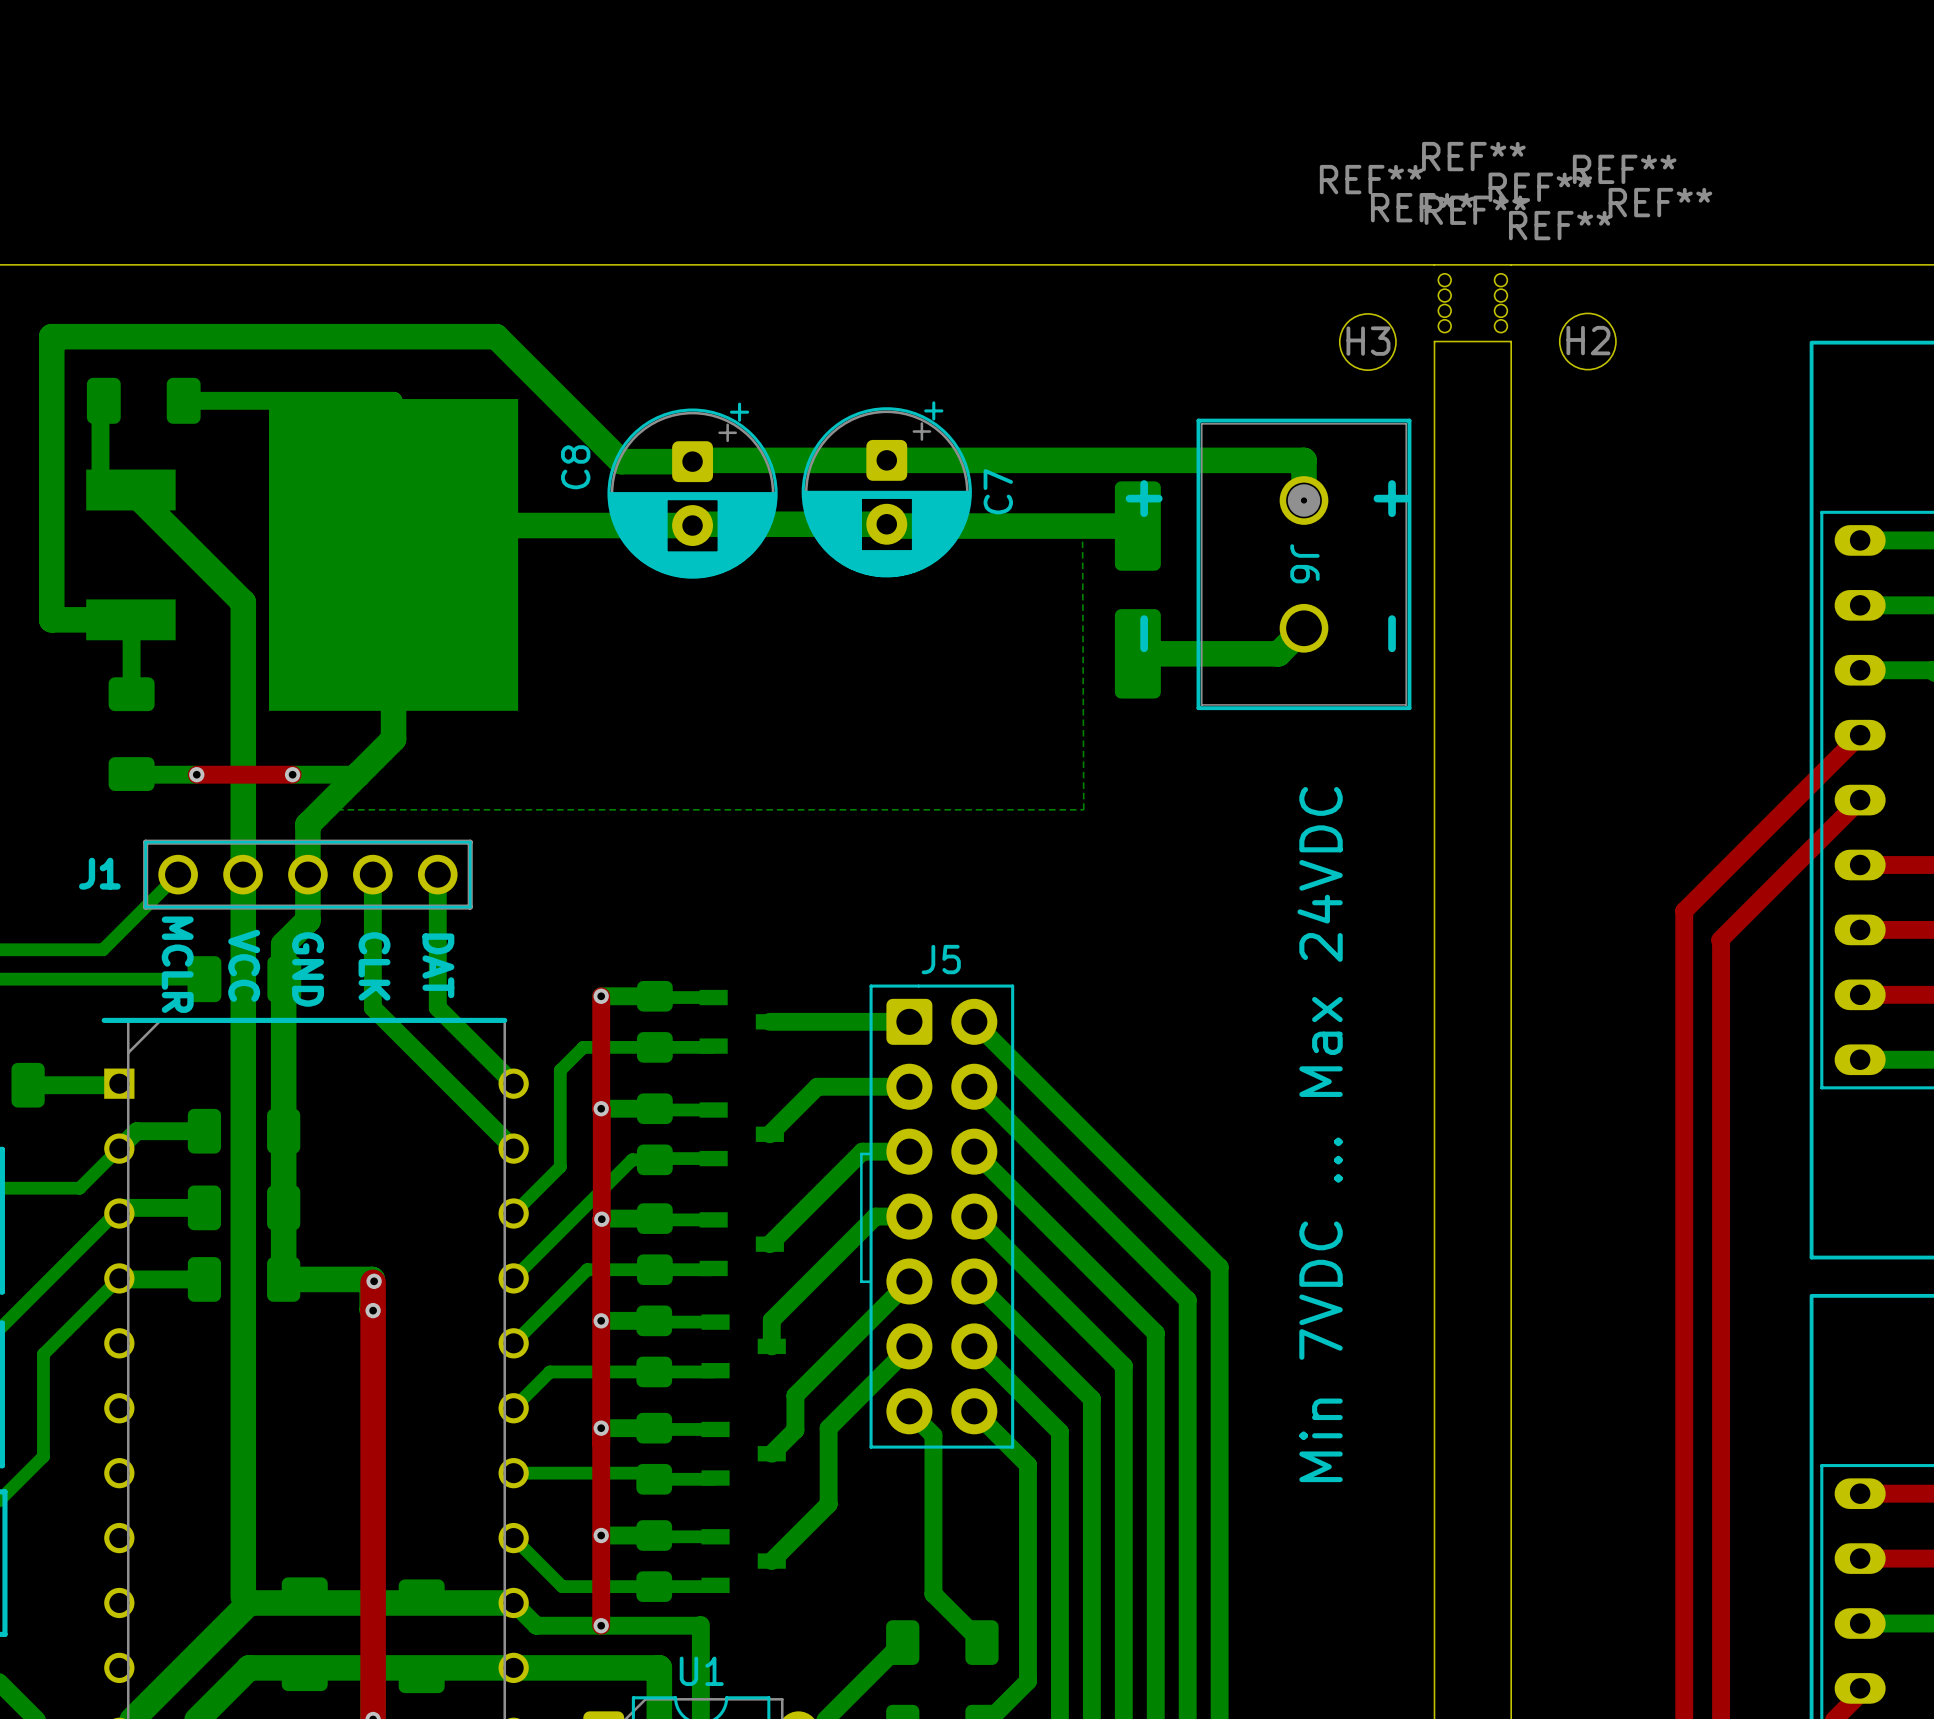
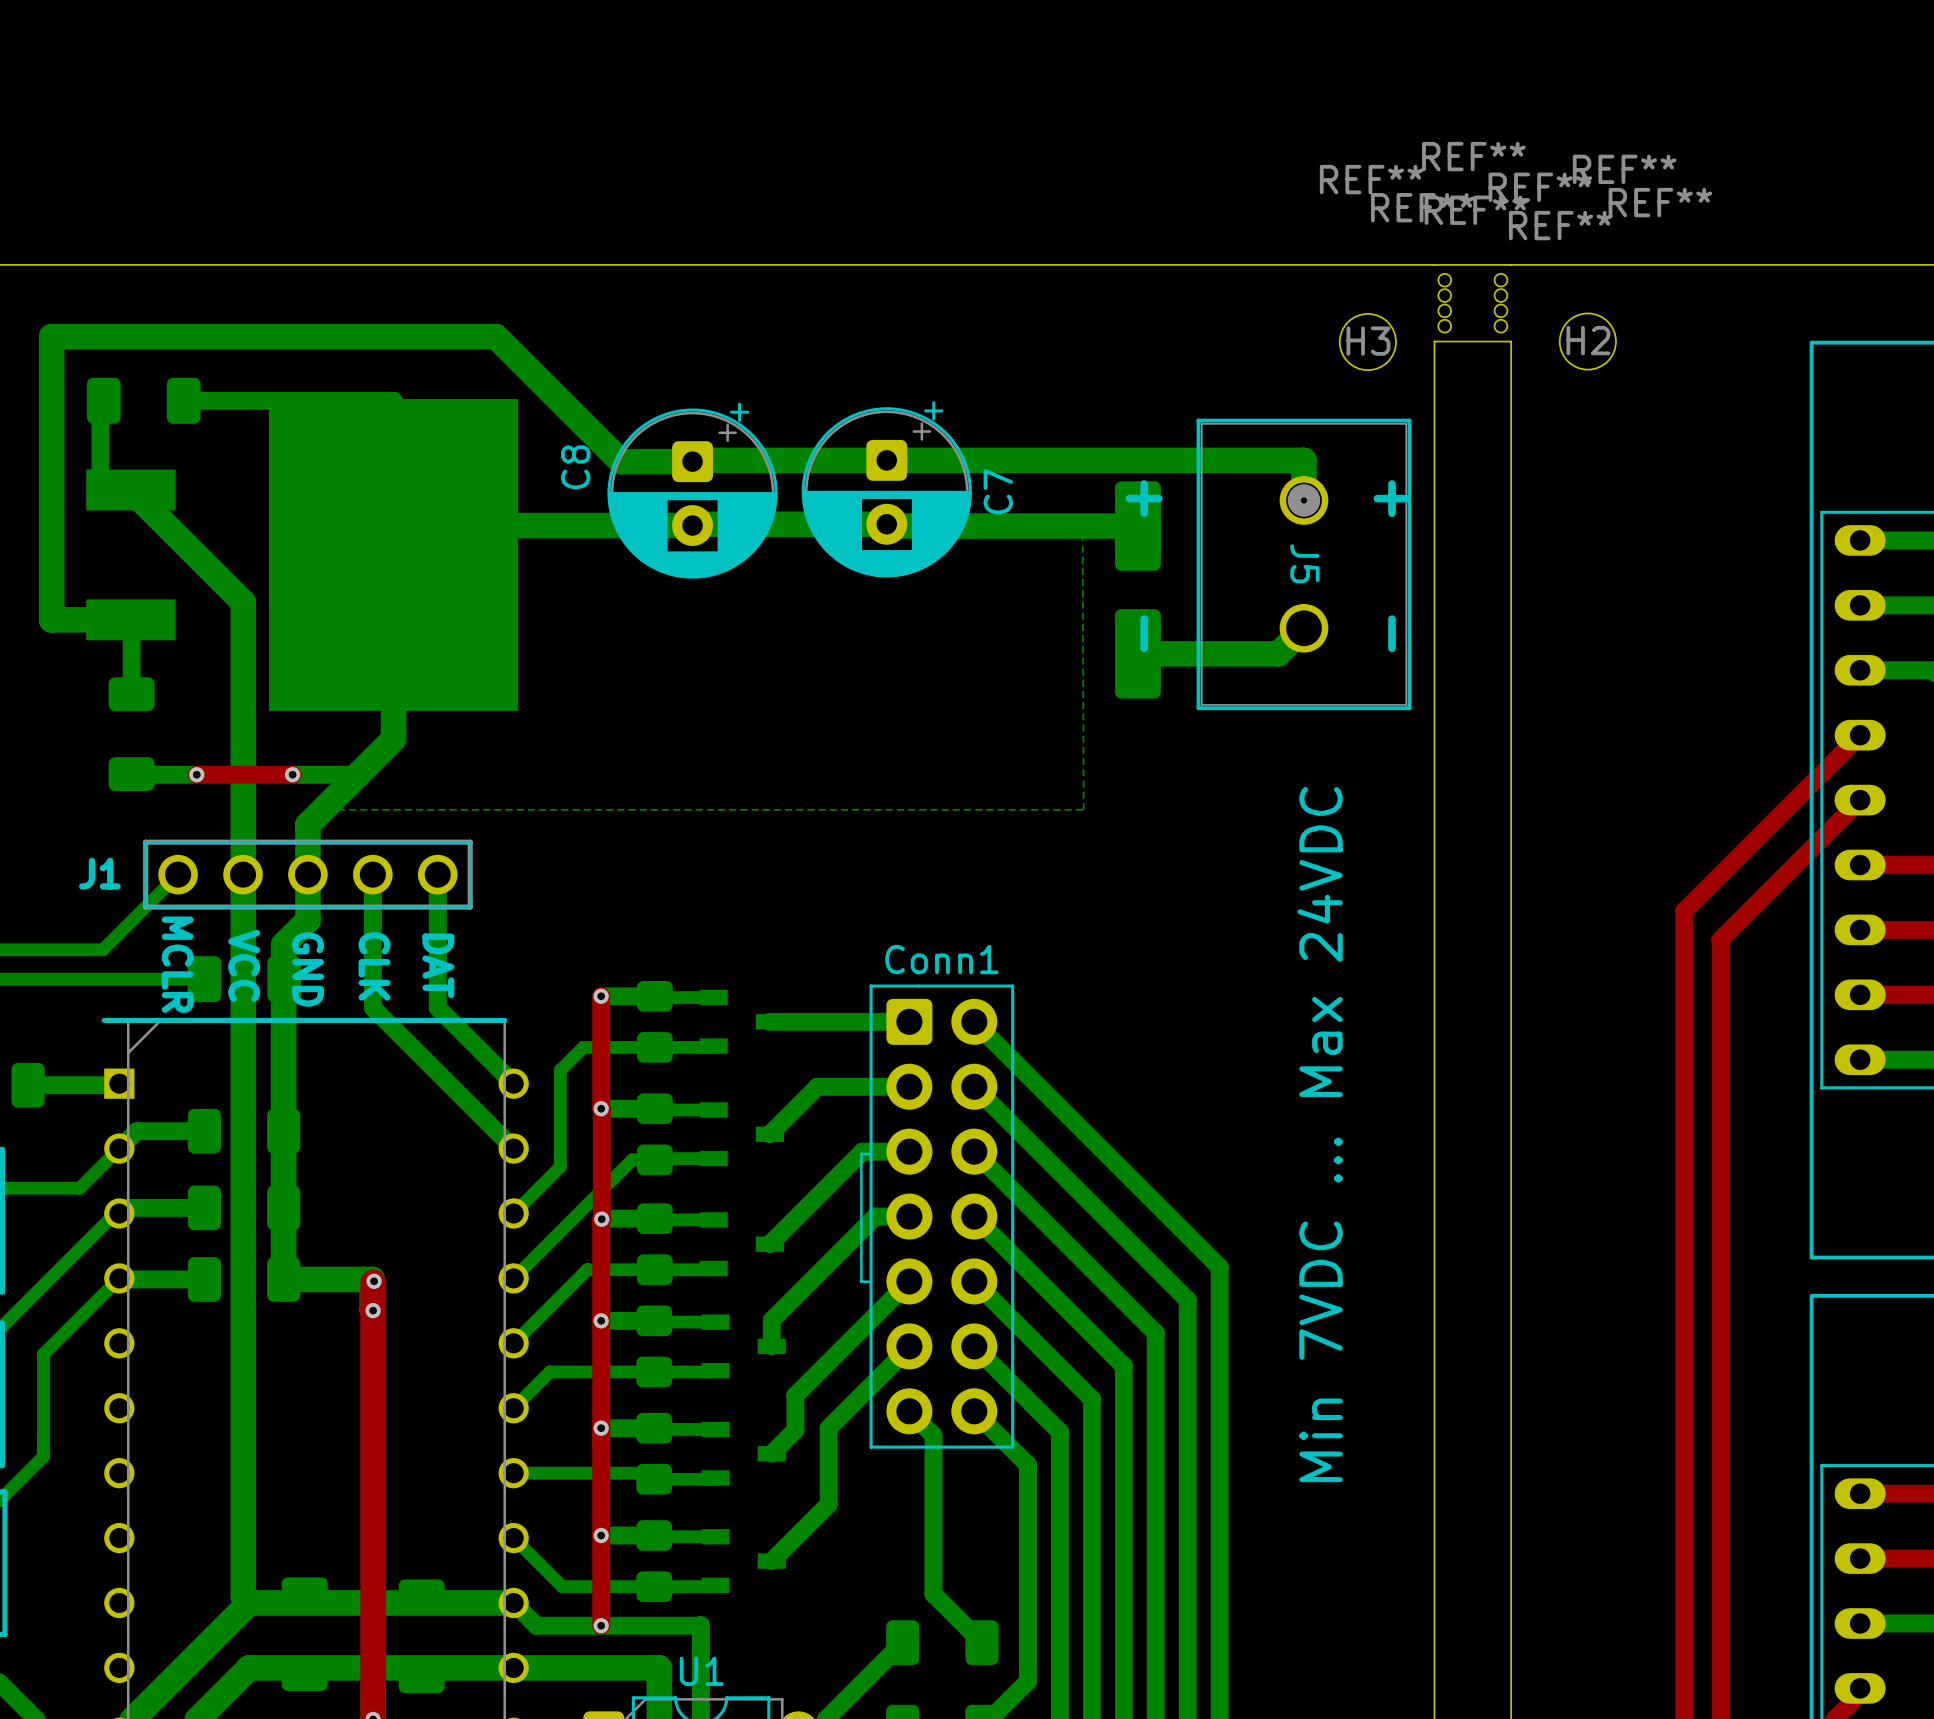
J6 name: J6 (1304, 563) -> J5 (1304, 563)
J5 name: J5 (941, 959) -> Conn1 (941, 959)

